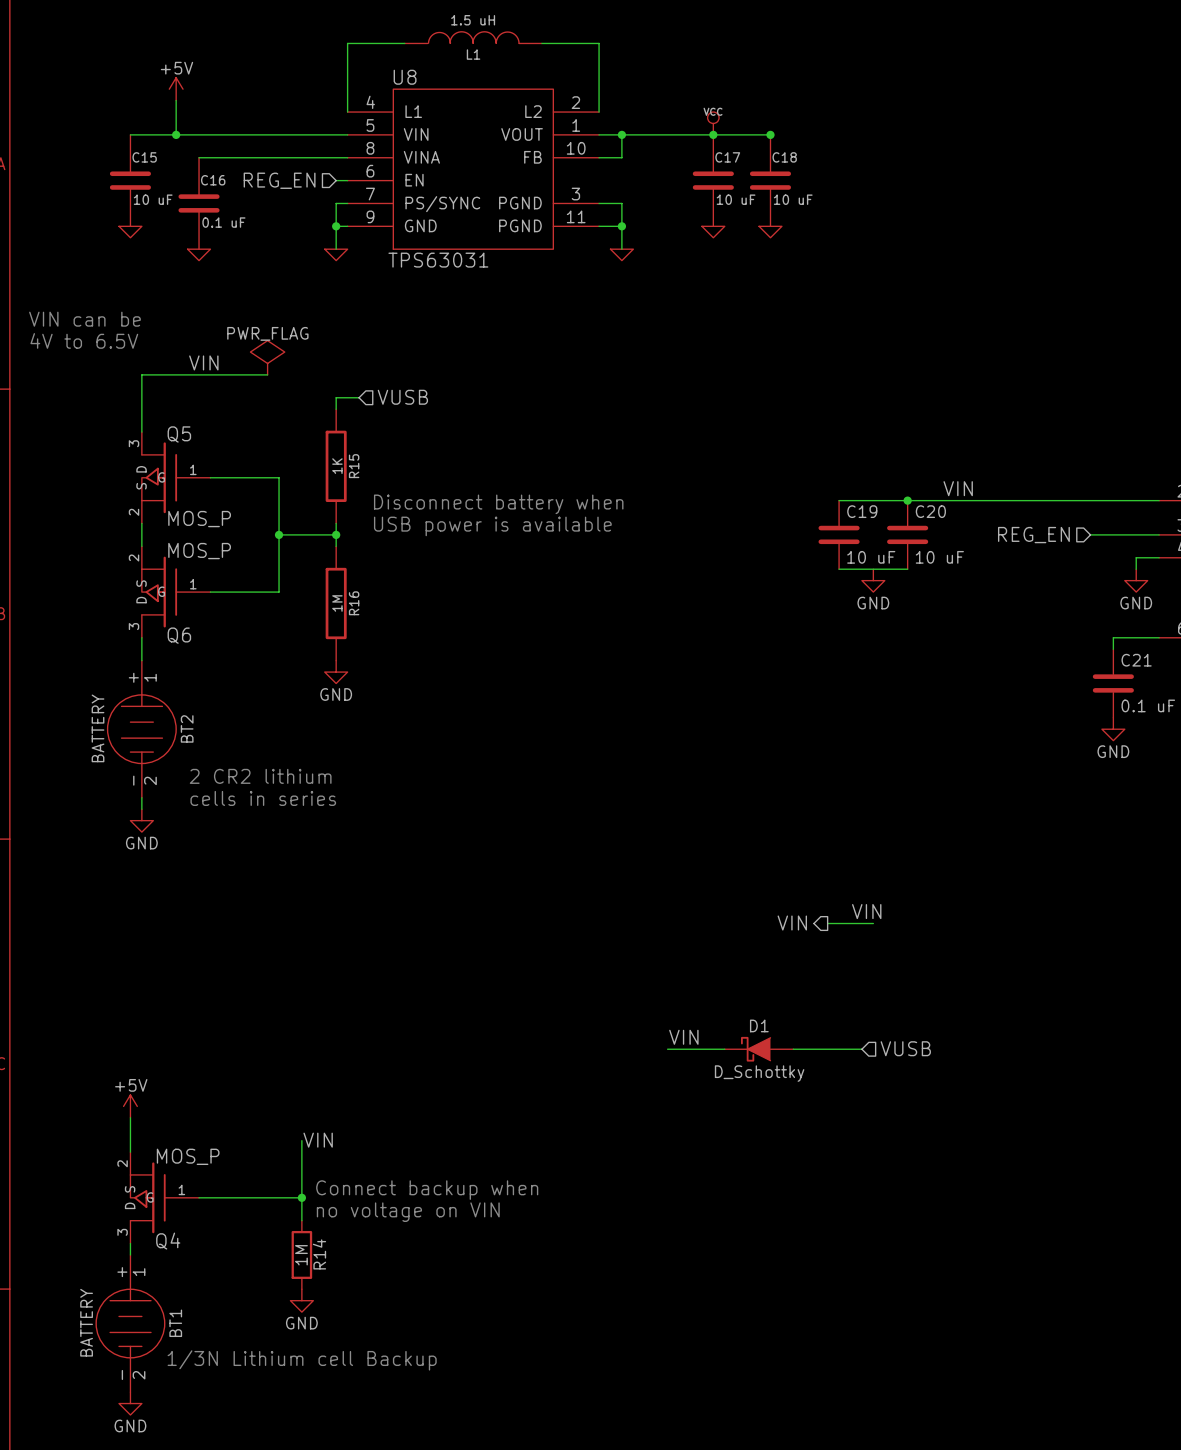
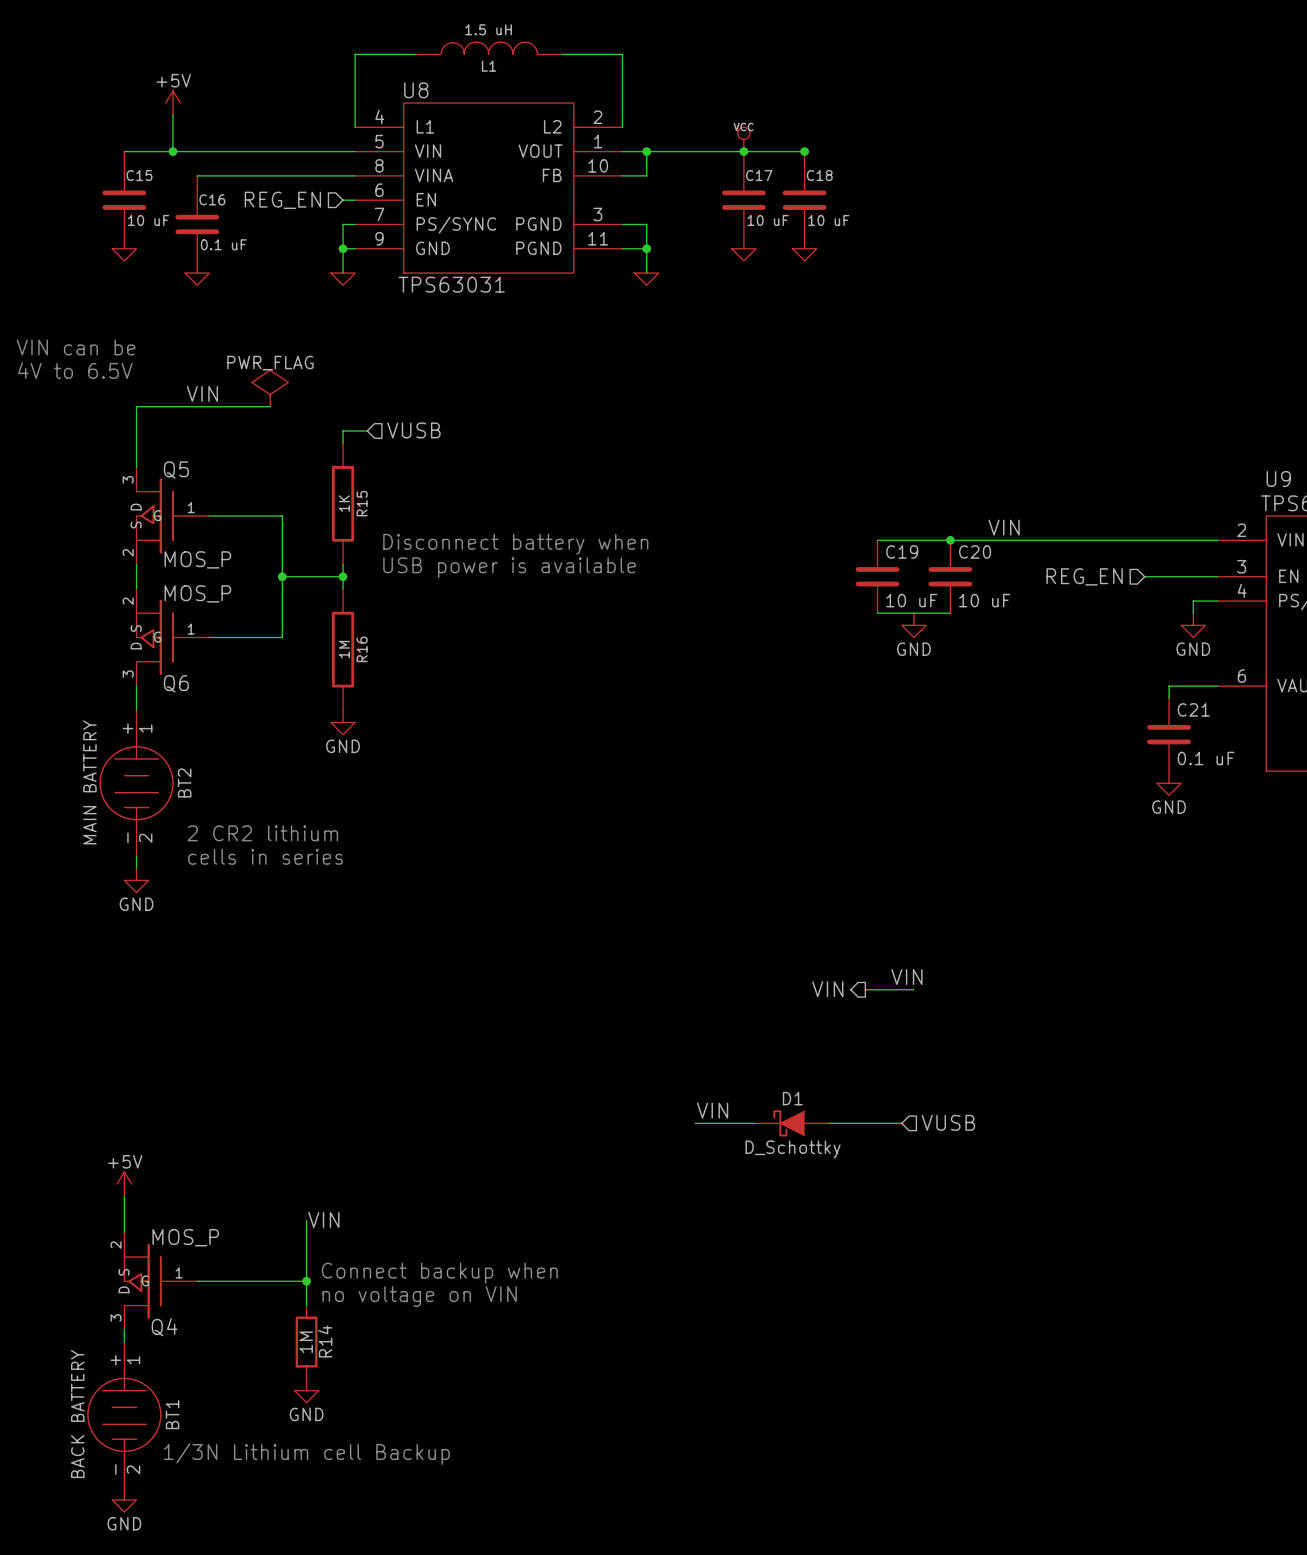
BT2 value: BATTERY (98, 728) -> MAIN BATTERY (89, 782)
BT1 value: BATTERY (86, 1322) -> BACK BATTERY (77, 1414)

